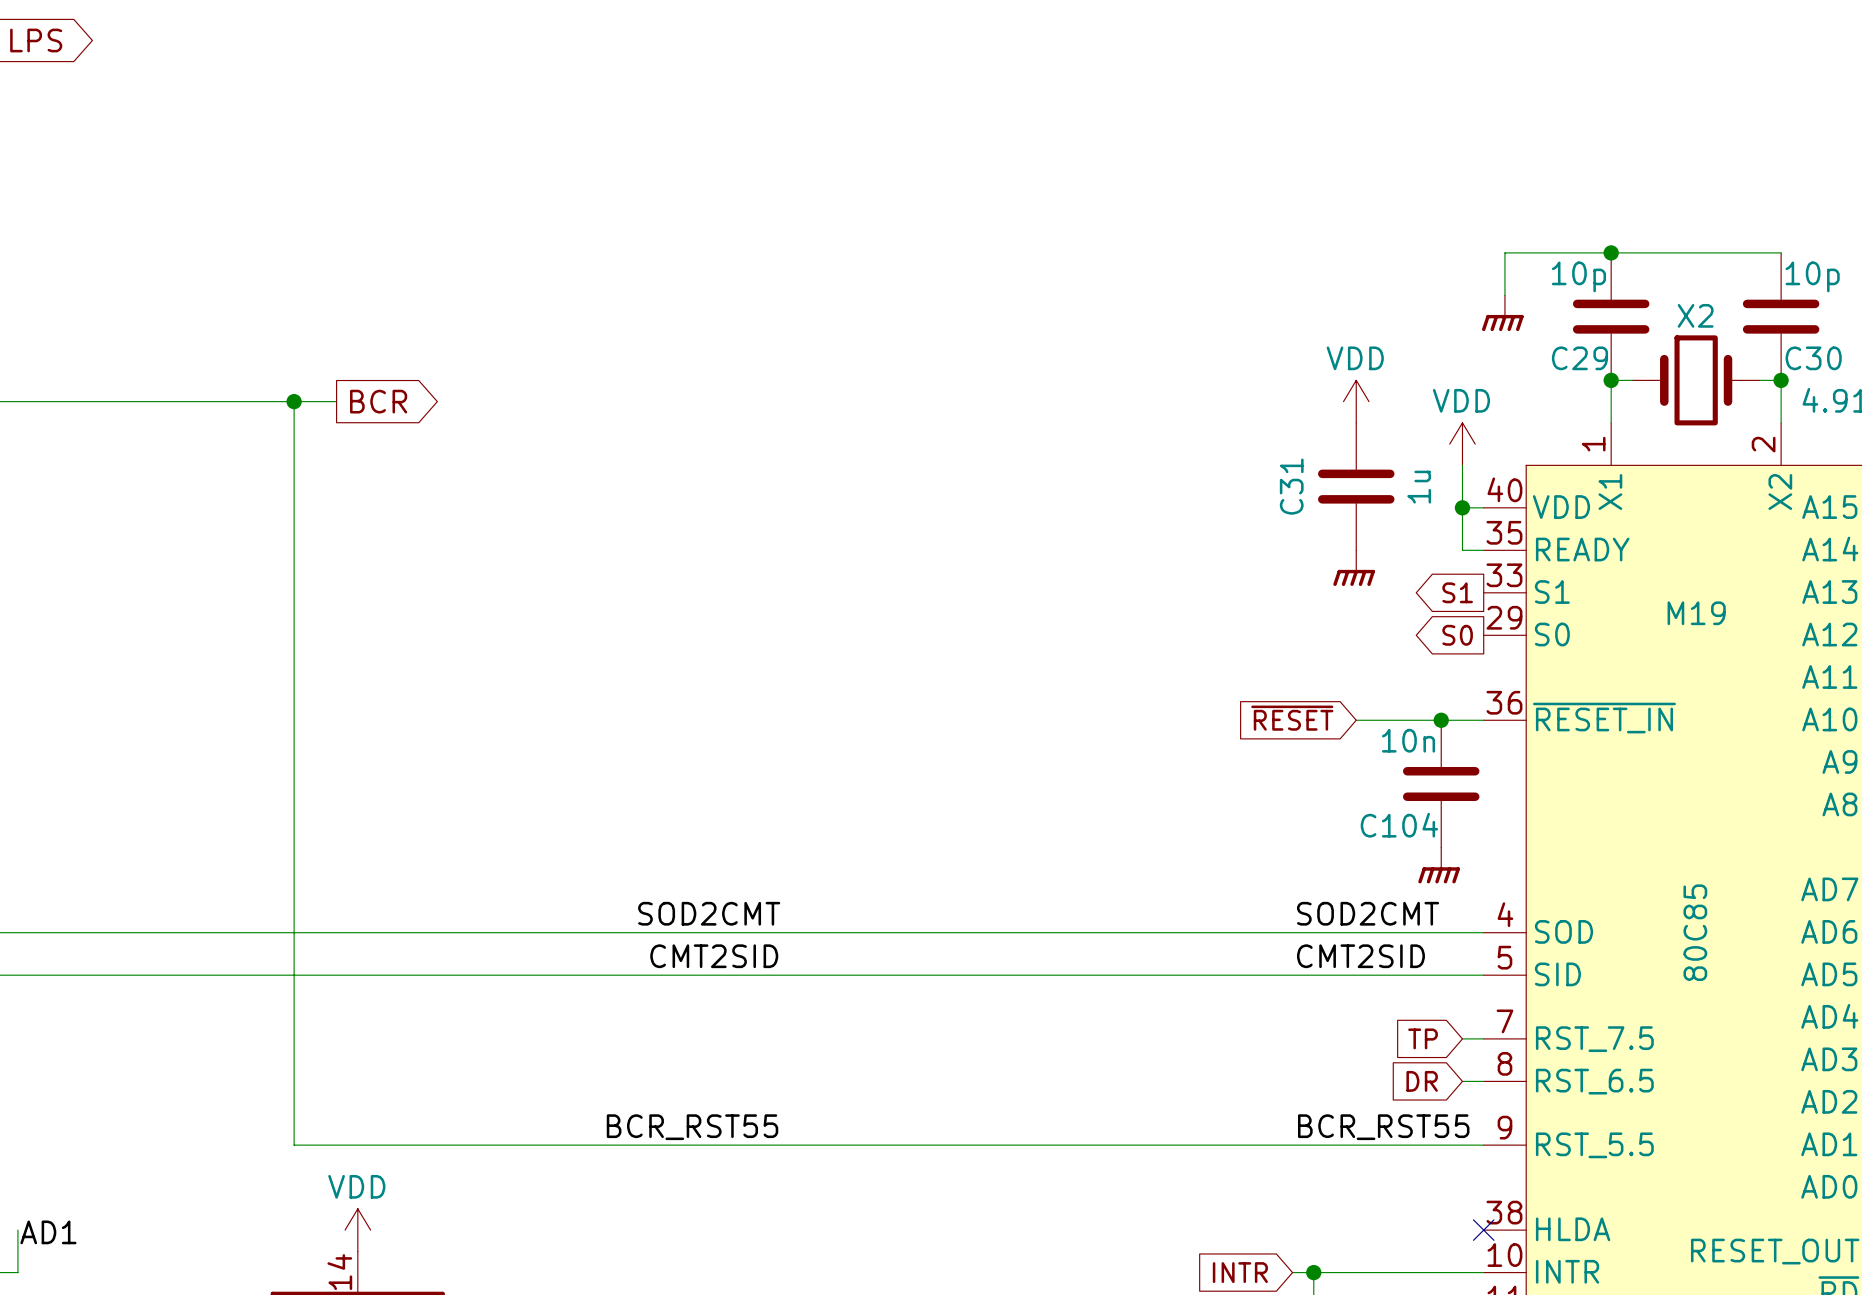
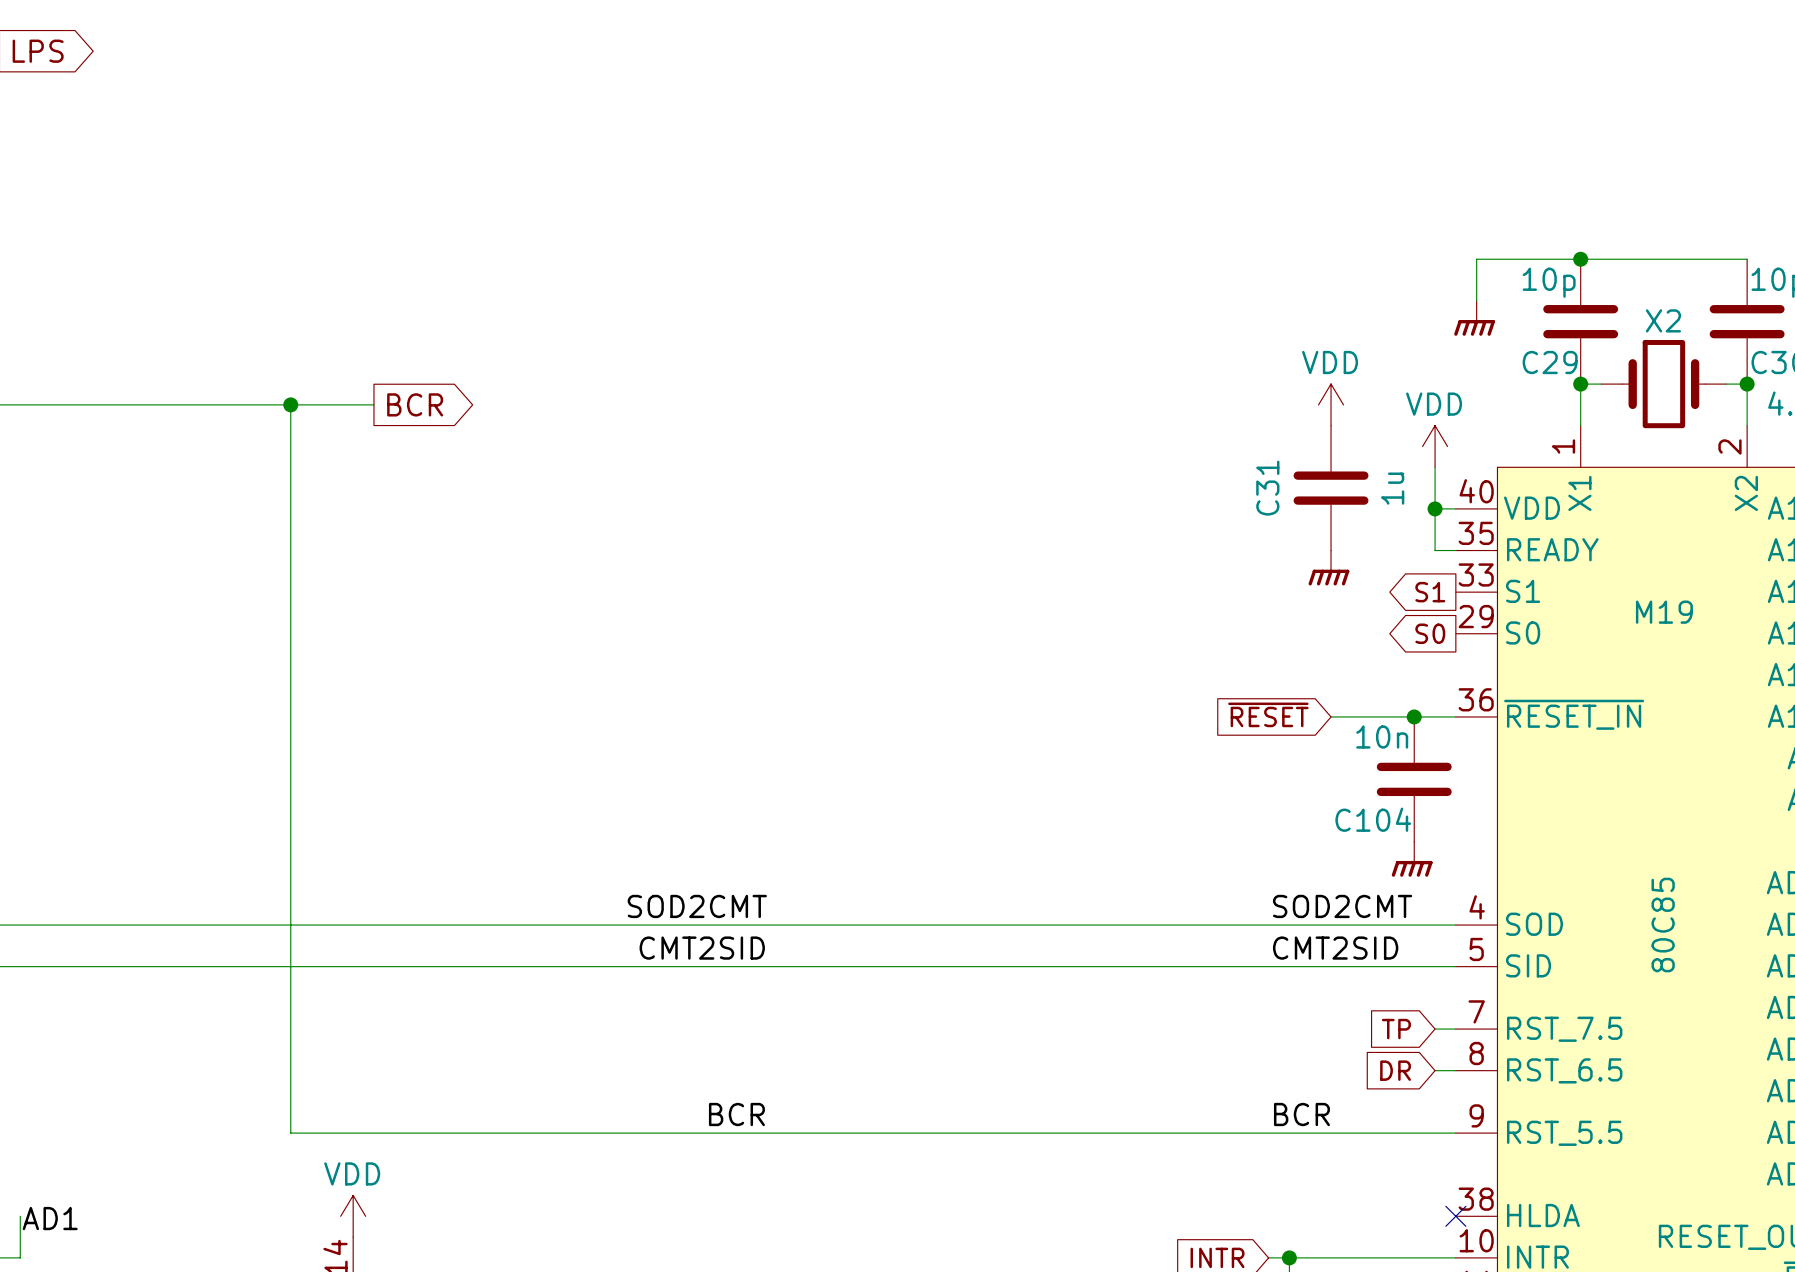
wire: none -> (332, 404) (373, 404)
global label position: BCR (378, 401) -> BCR (415, 404)
label: BCR_RST55 (692, 1127) -> BCR (736, 1114)
label: BCR_RST55 (1383, 1127) -> BCR (1301, 1114)

